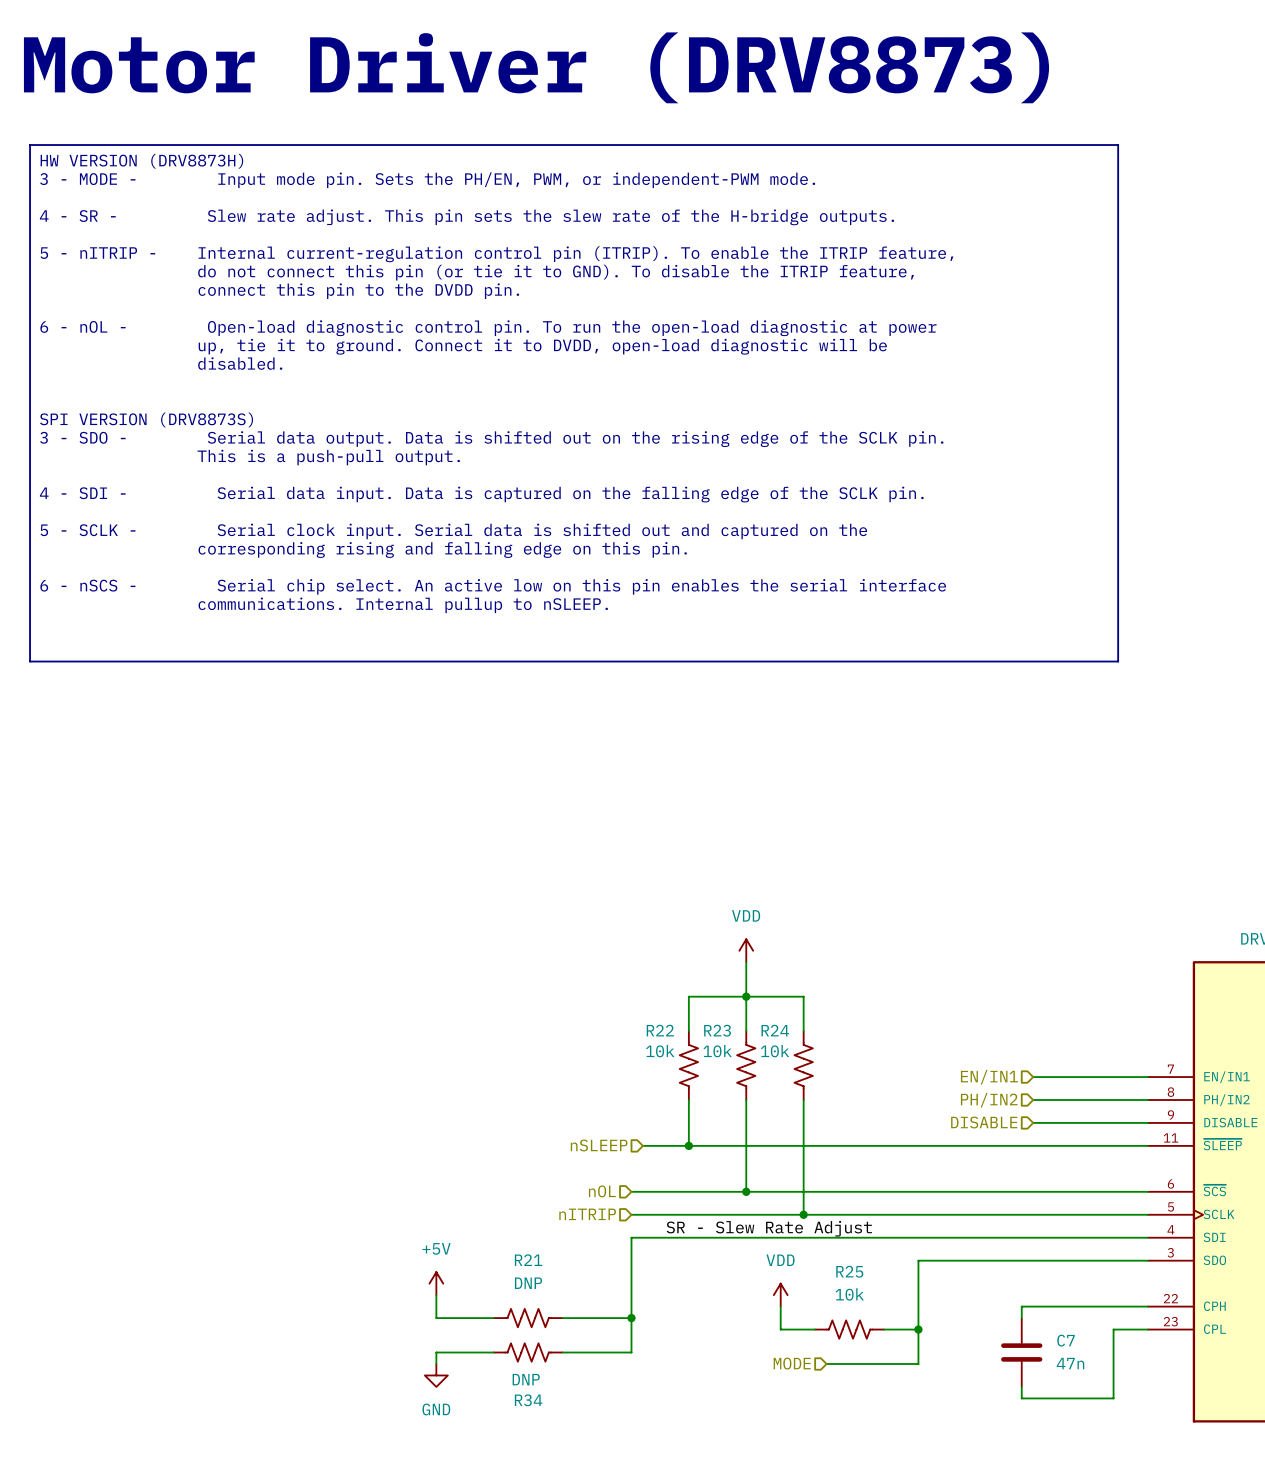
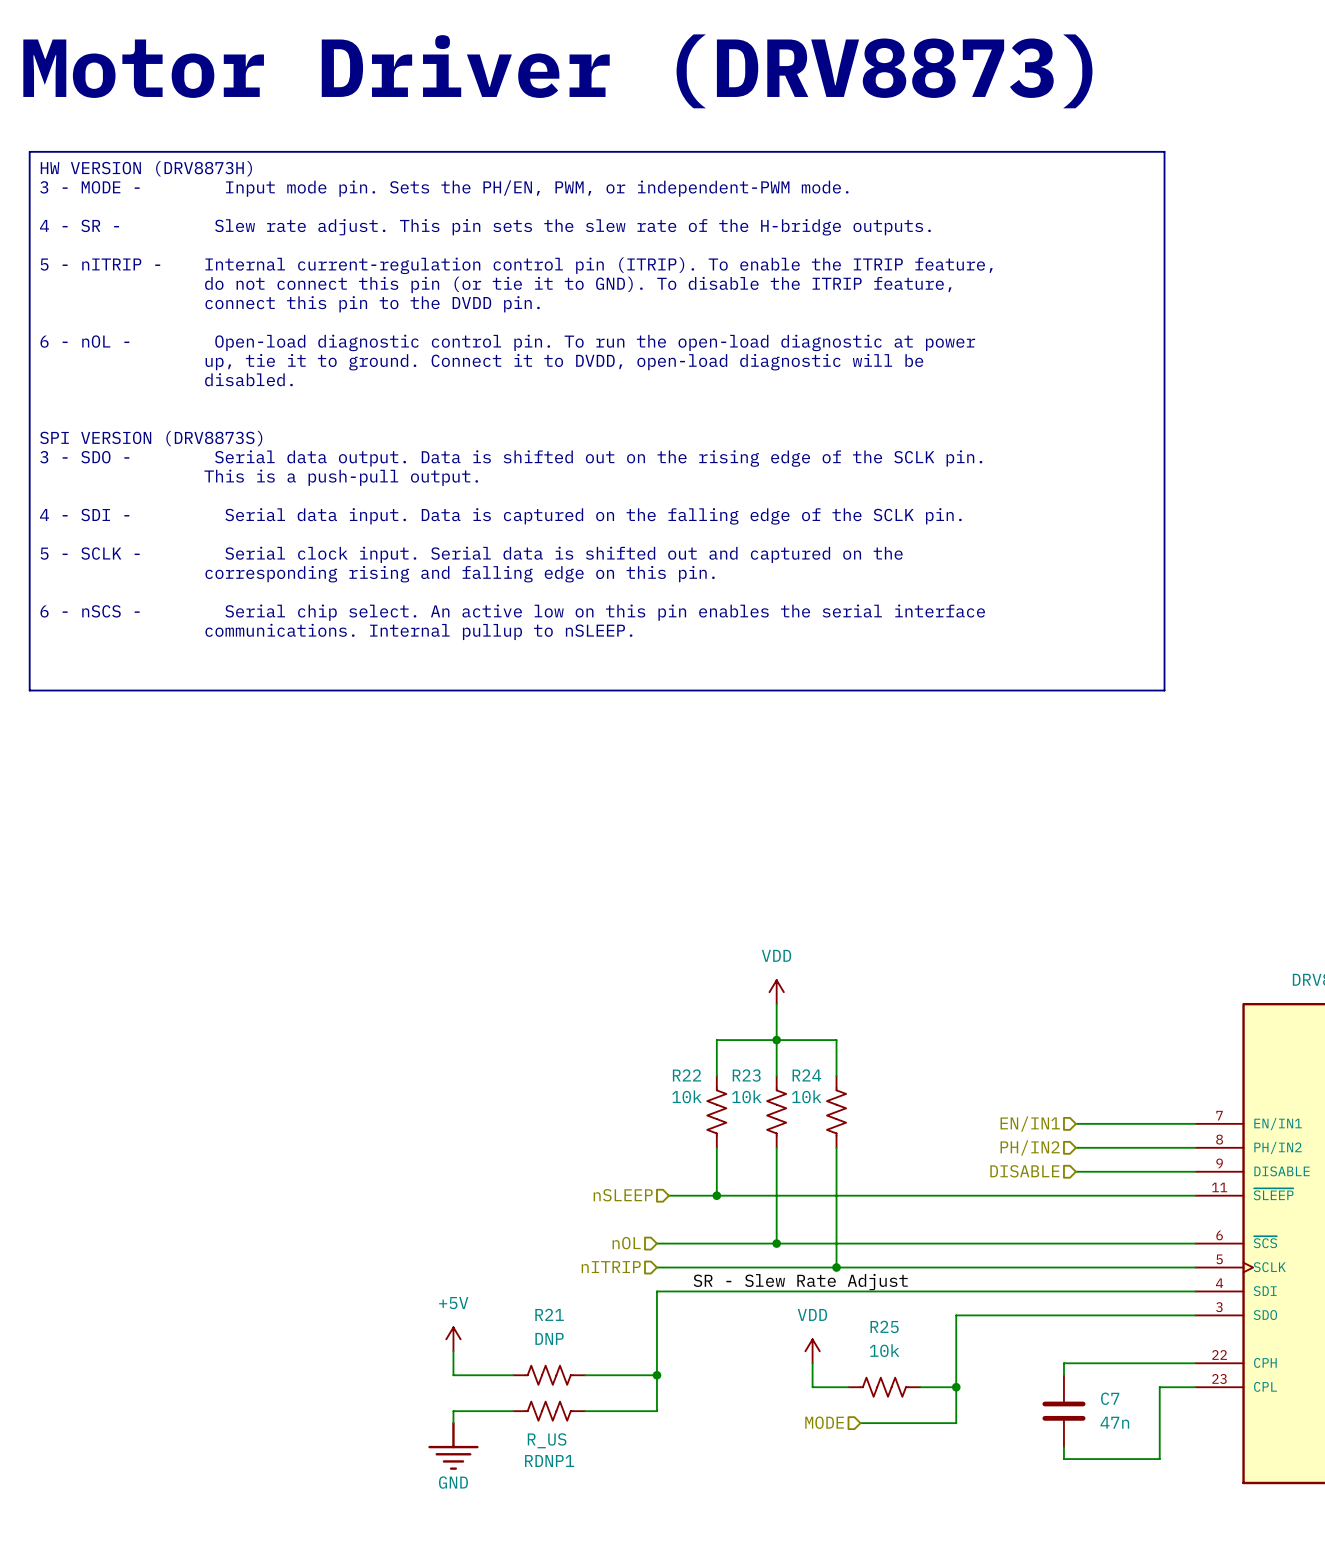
power symbol: GND (436, 1375) -> none
R34 value: DNP (526, 1379) -> R_US (547, 1440)
power symbol: none -> GND (453, 1445)
R34 name: R34 (528, 1400) -> RDNP1 (549, 1461)

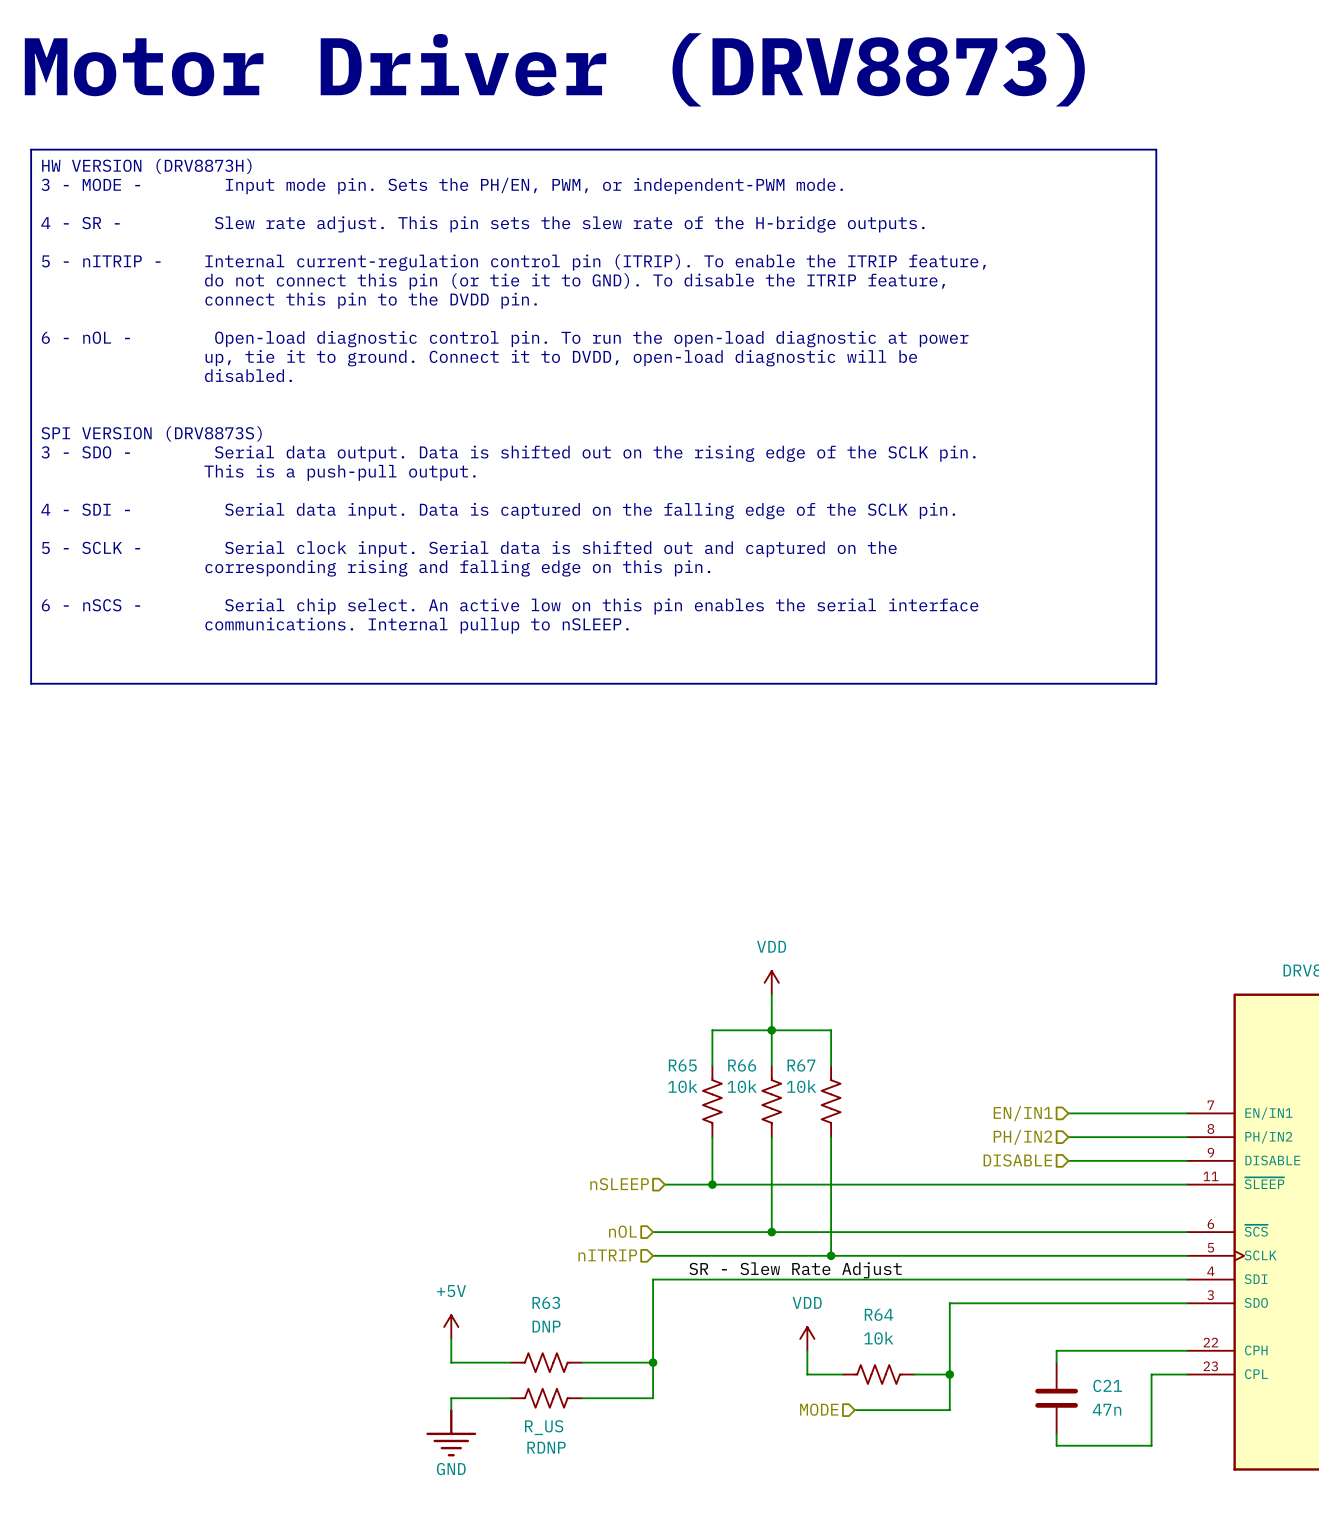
R22 name: R22 (686, 1075) -> R65 (682, 1065)
R23 name: R23 (746, 1075) -> R66 (742, 1065)
R24 name: R24 (806, 1075) -> R67 (801, 1065)
R21 name: R21 (549, 1314) -> R63 (546, 1302)
R25 name: R25 (884, 1326) -> R64 (879, 1314)
C7 name: C7 (1110, 1398) -> C21 (1107, 1385)
RDNP1 name: RDNP1 (549, 1461) -> RDNP (546, 1447)

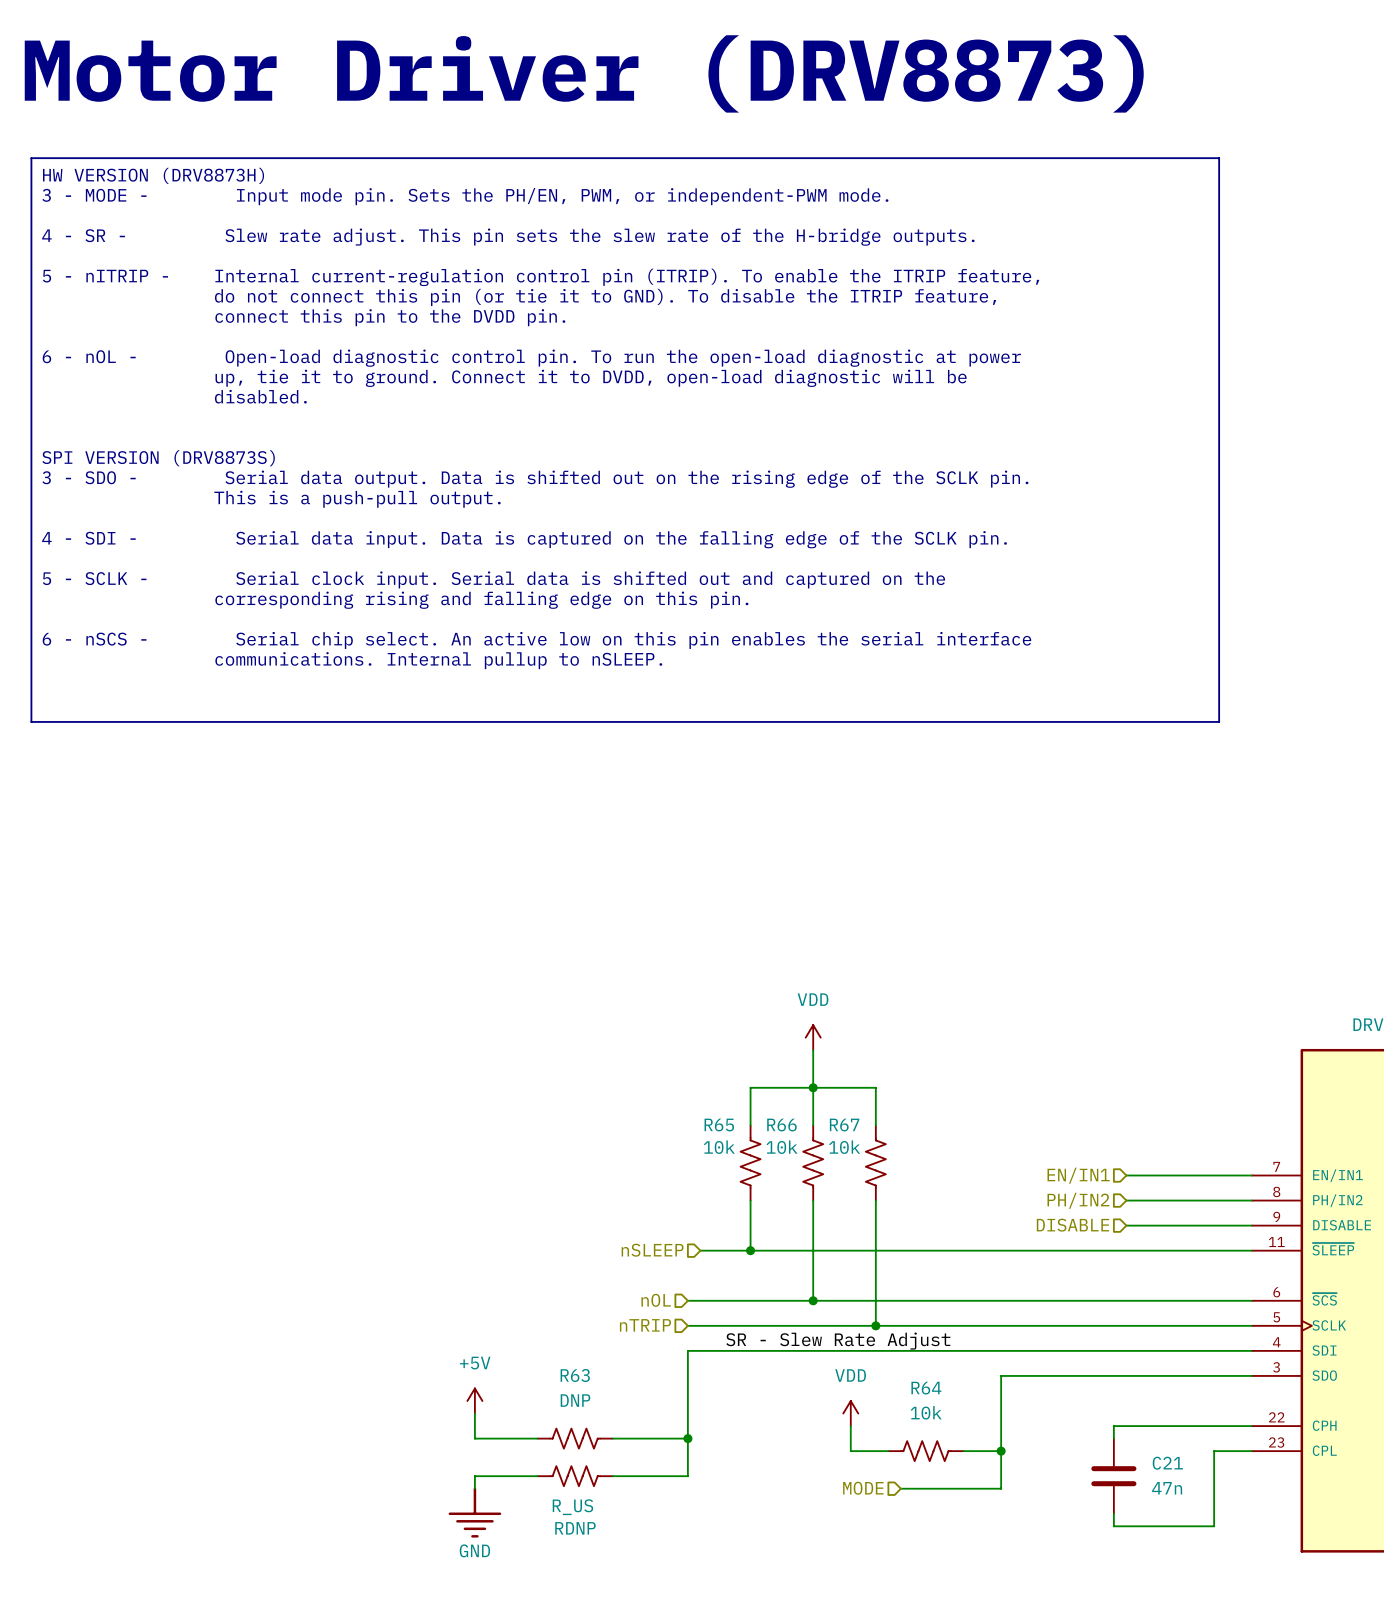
hierarchical label: nITRIP (607, 1255) -> nTRIP (645, 1325)

